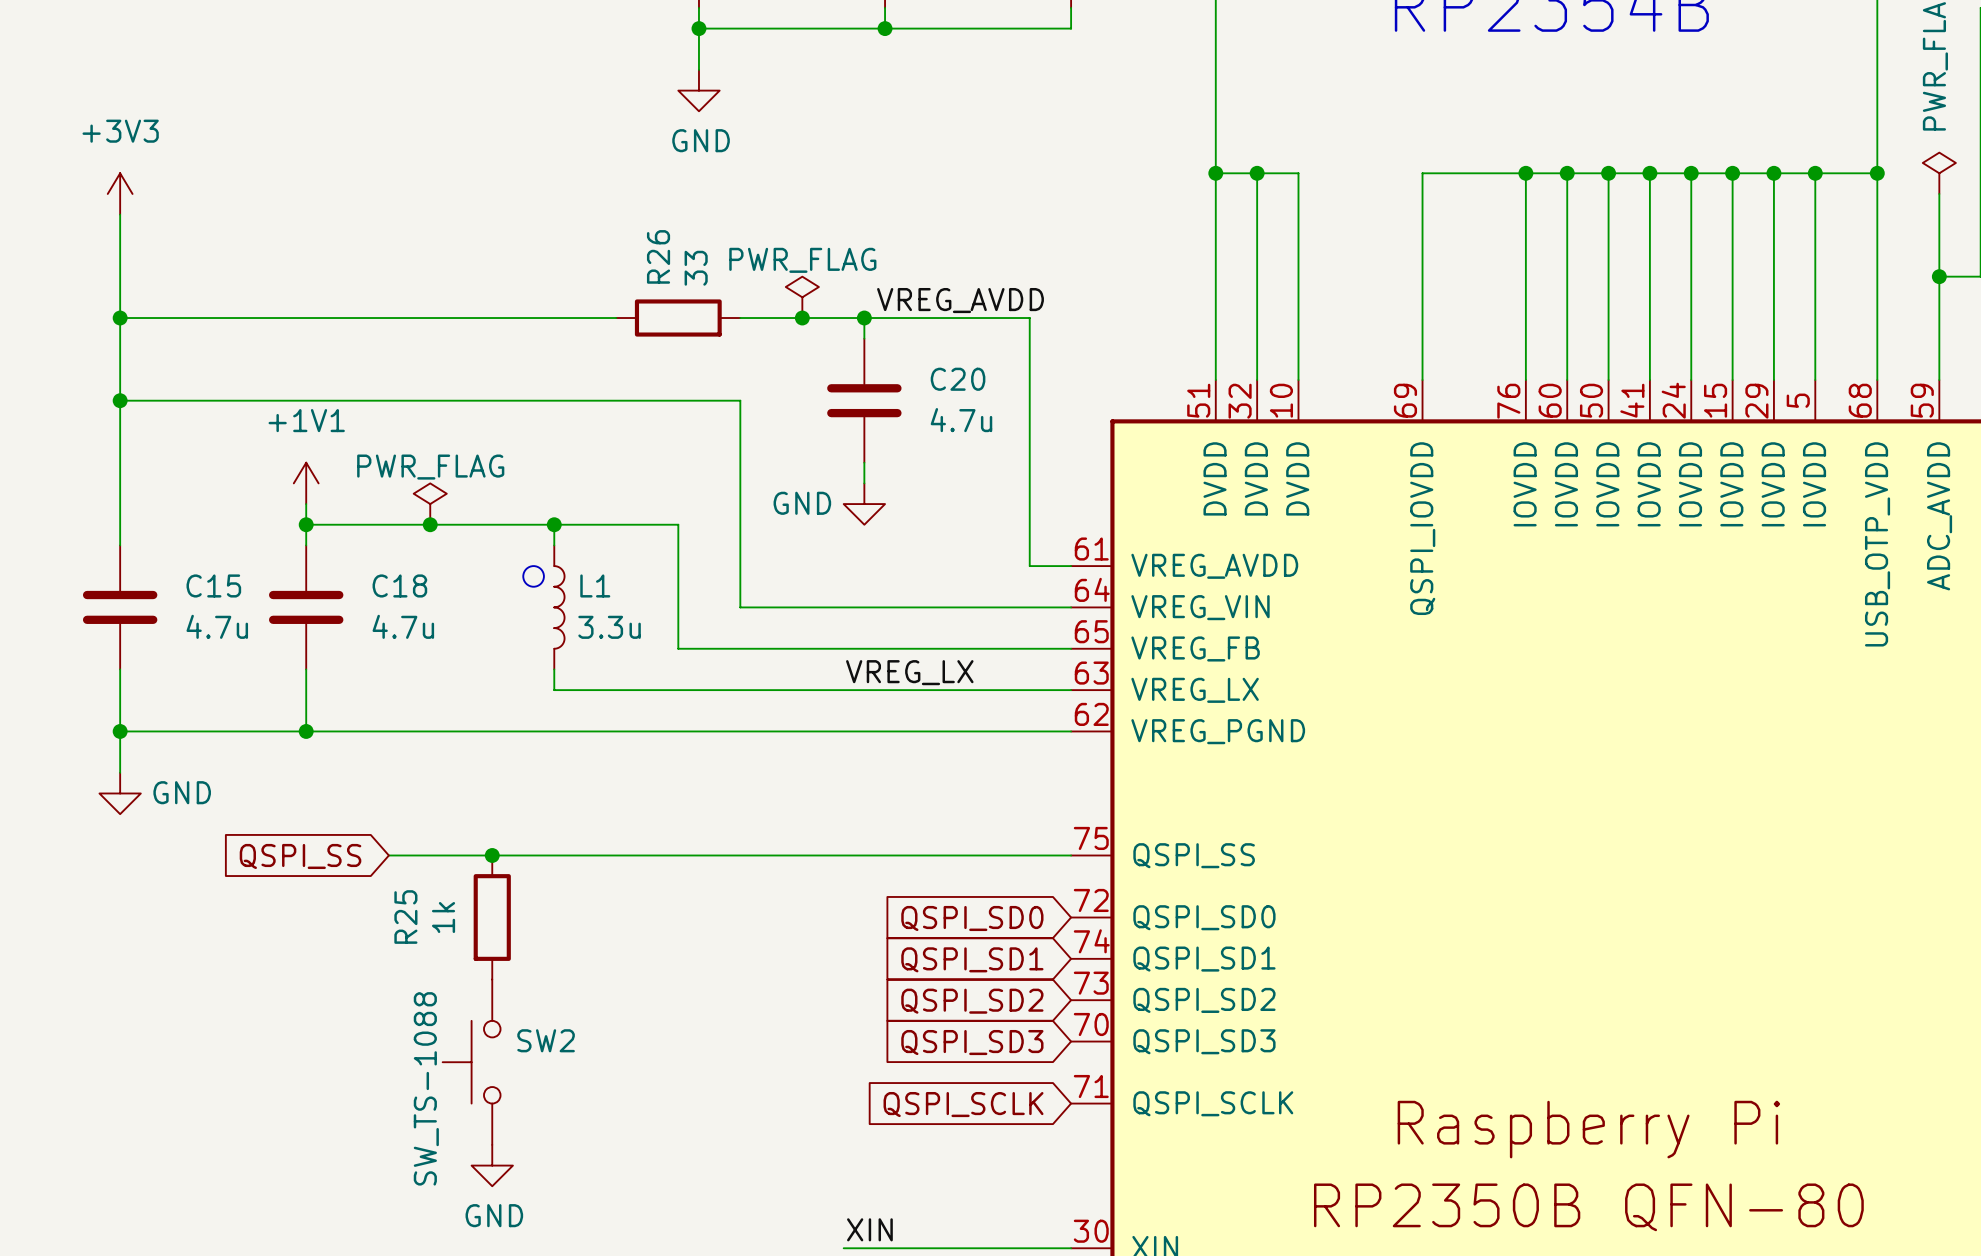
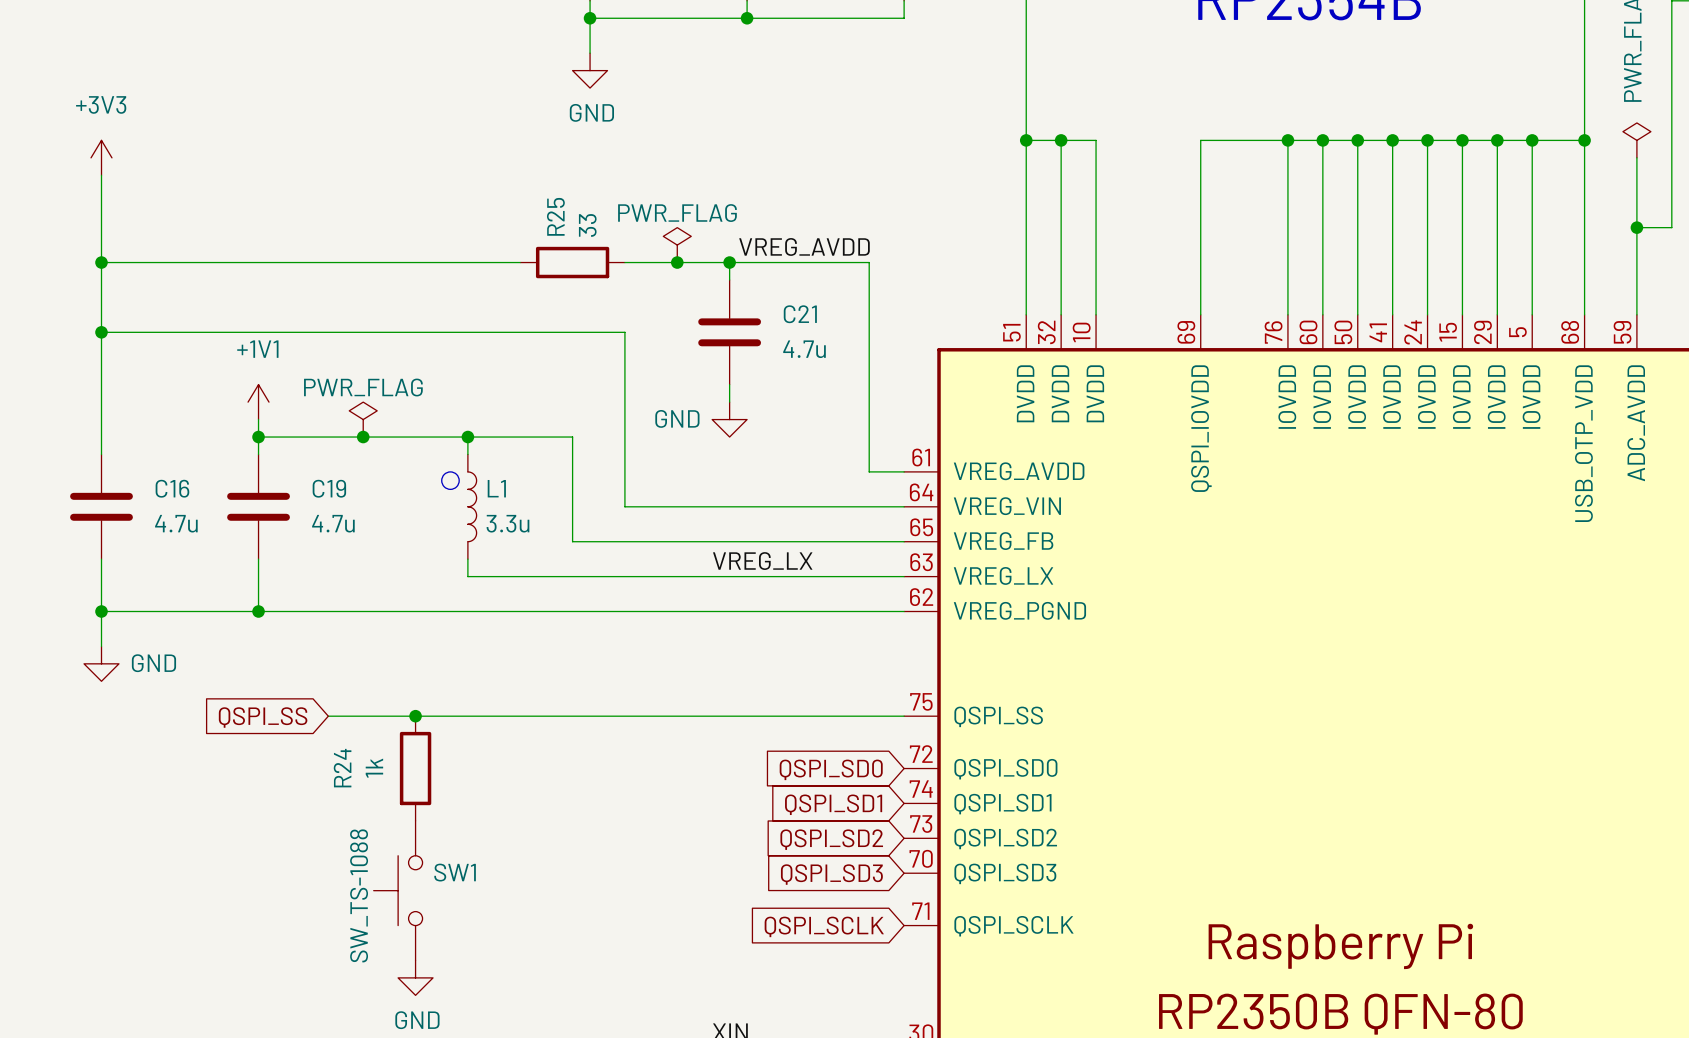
R26 name: R26 (658, 256) -> R25 (555, 216)
C20 name: C20 (958, 379) -> C21 (800, 314)
C15 name: C15 (213, 585) -> C16 (172, 488)
C18 name: C18 (399, 585) -> C19 (329, 488)
R25 name: R25 (405, 917) -> R24 (342, 768)
SW2 name: SW2 (546, 1040) -> SW1 (455, 872)

